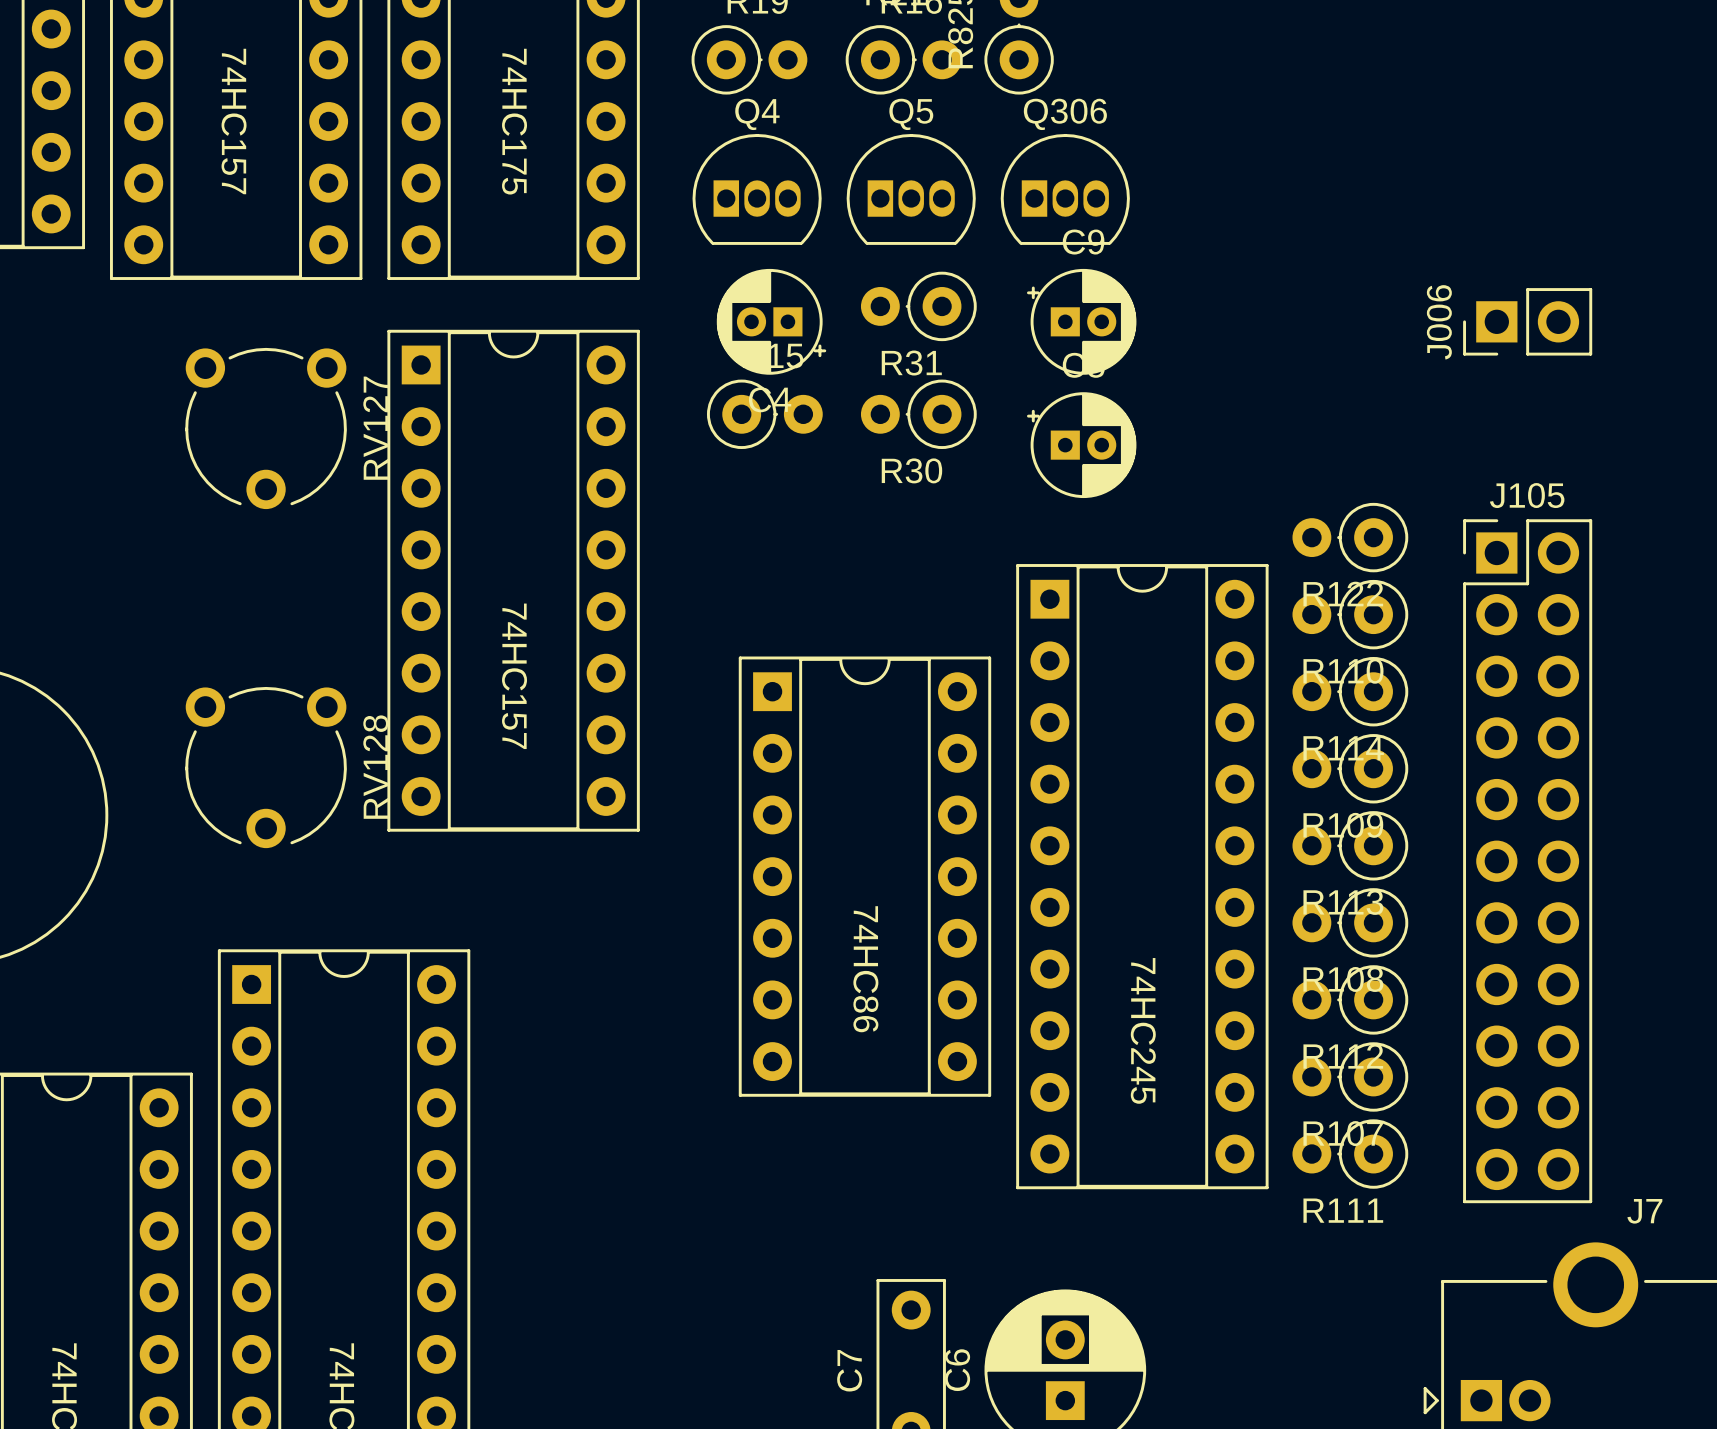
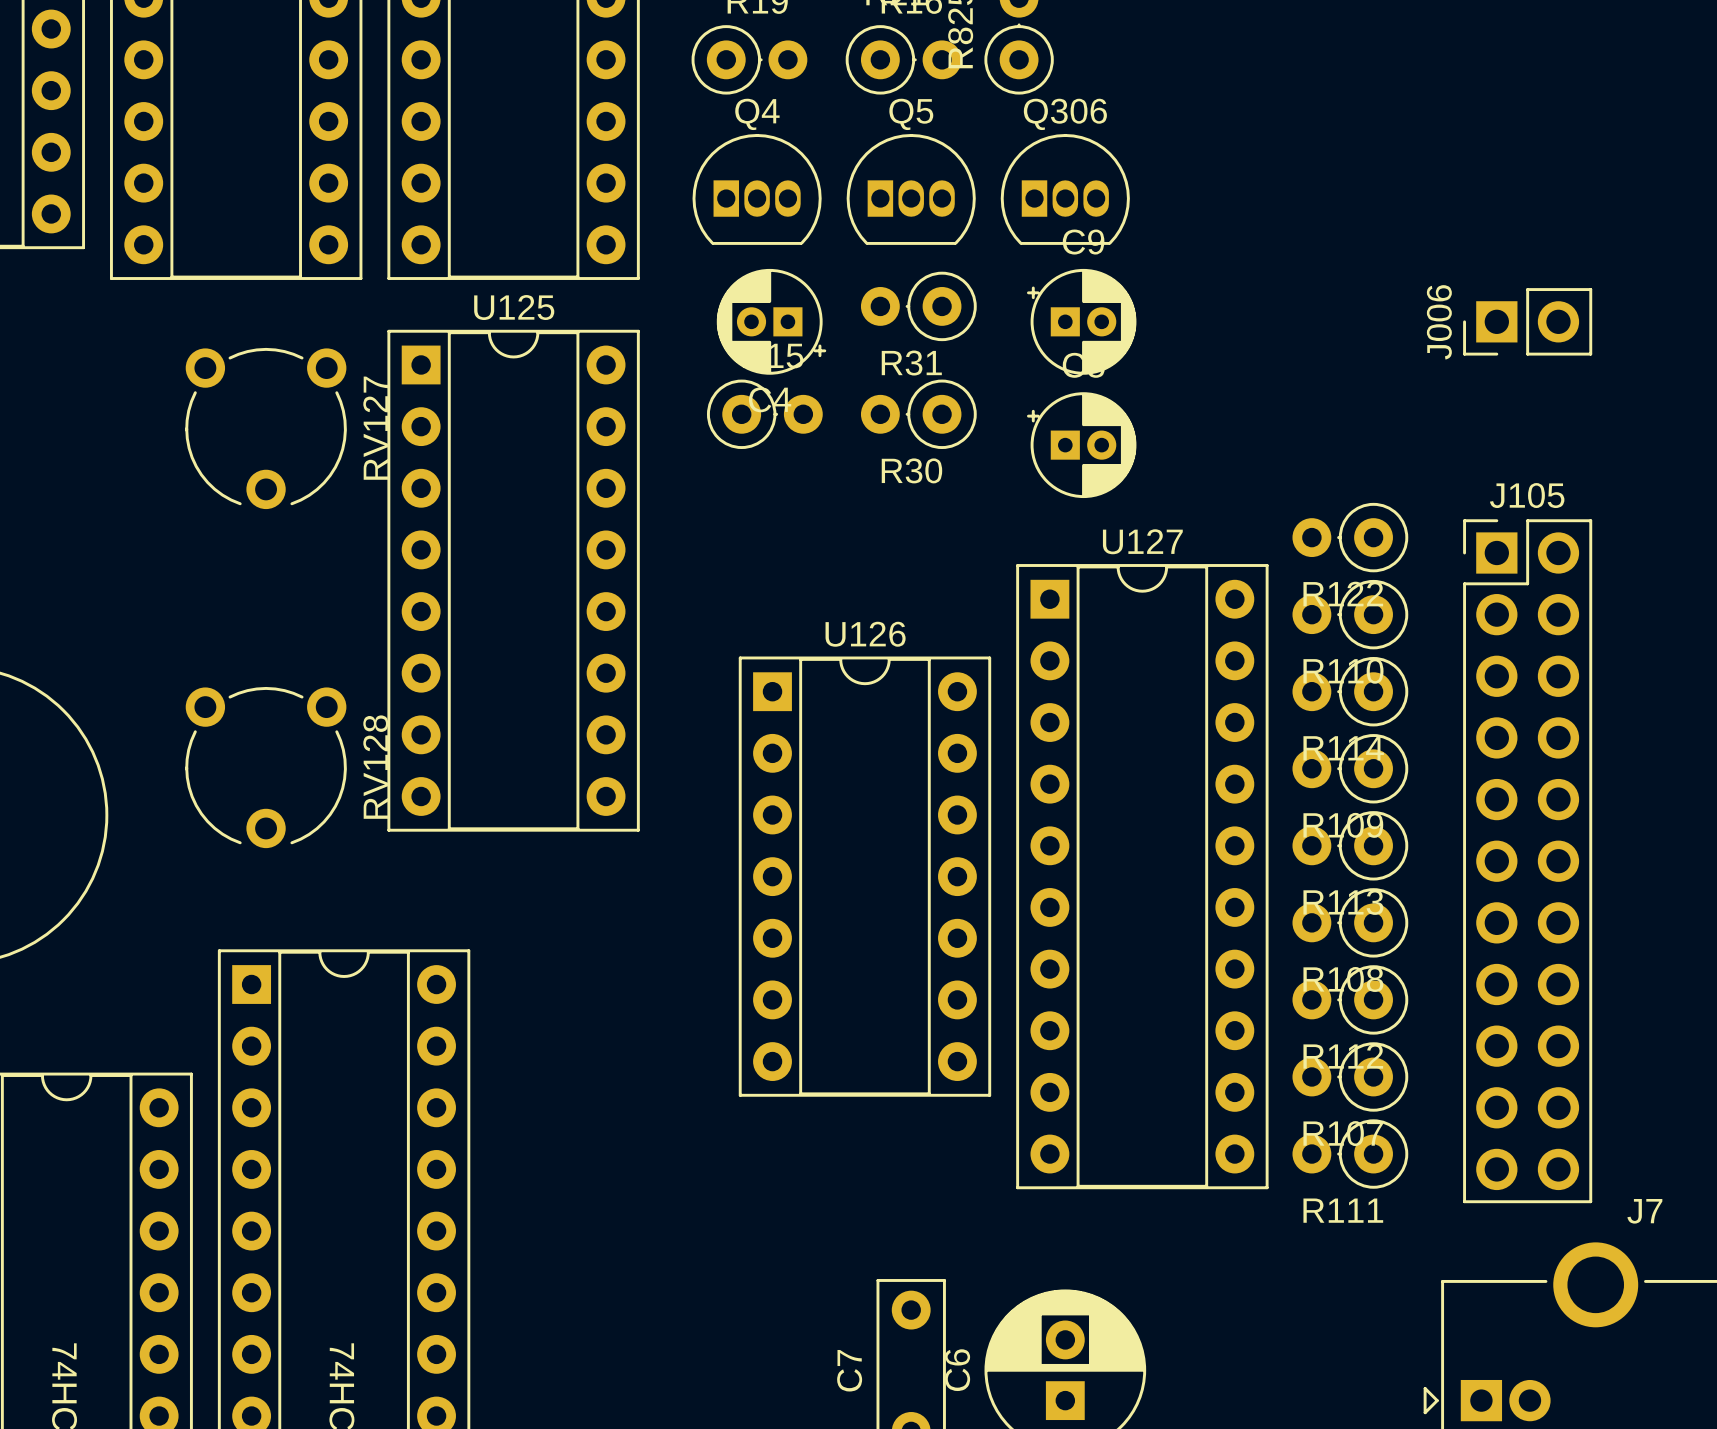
part value: 74HC157 (234, 121) -> none
part value: 74HC175 (514, 121) -> none
U125 name: none -> U125 (514, 307)
U127 name: none -> U127 (1142, 541)
U126 name: none -> U126 (865, 634)
U125 value: 74HC157 (514, 676) -> none
U126 value: 74HC86 (865, 969) -> none
U127 value: 74HC245 (1143, 1030) -> none

